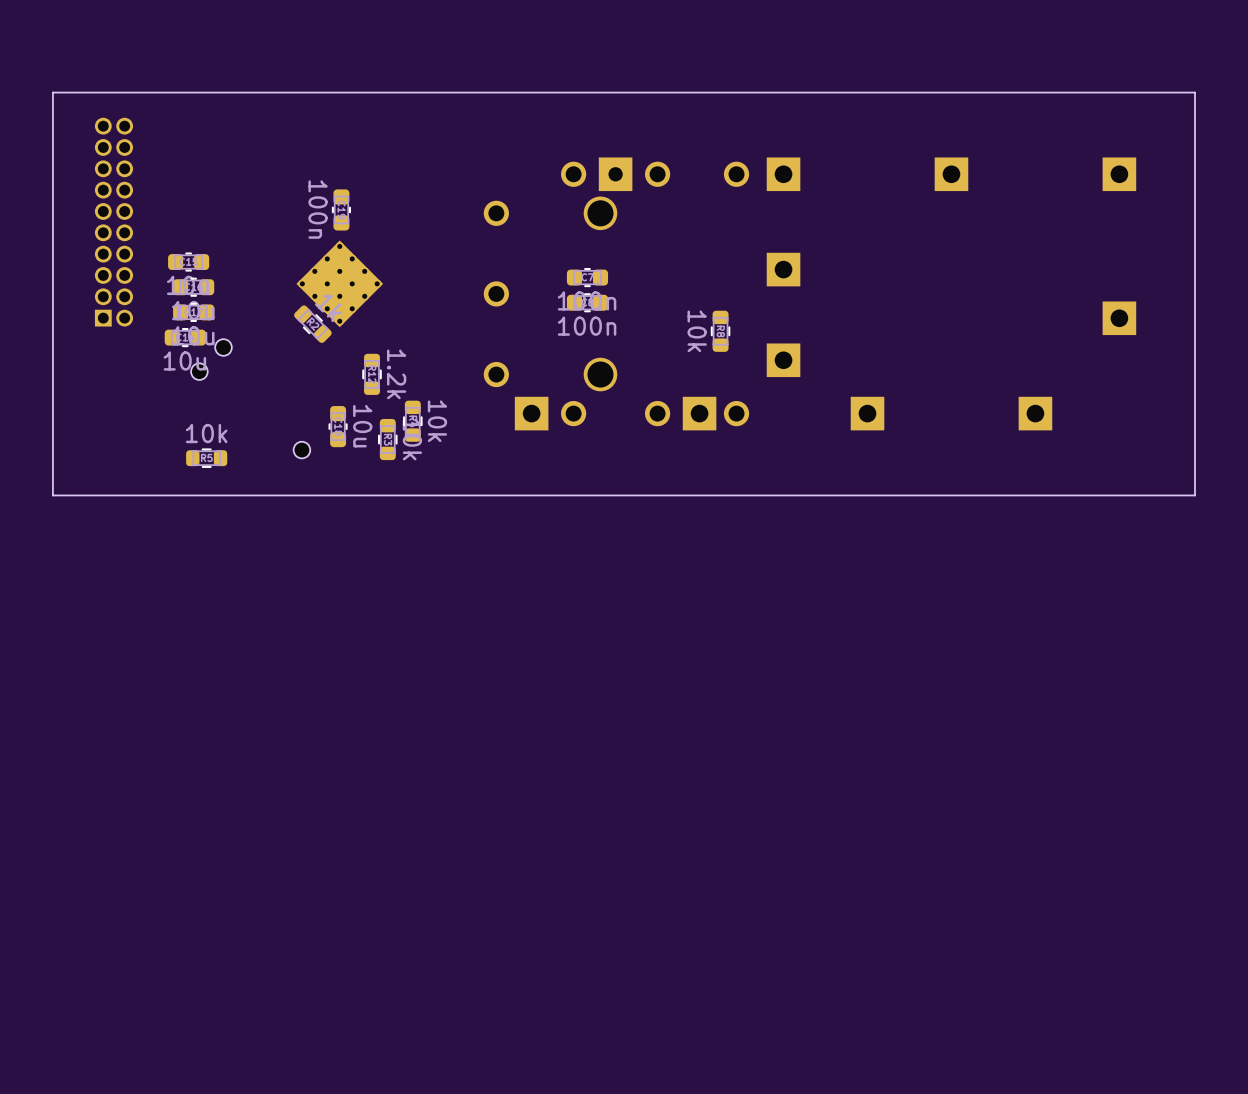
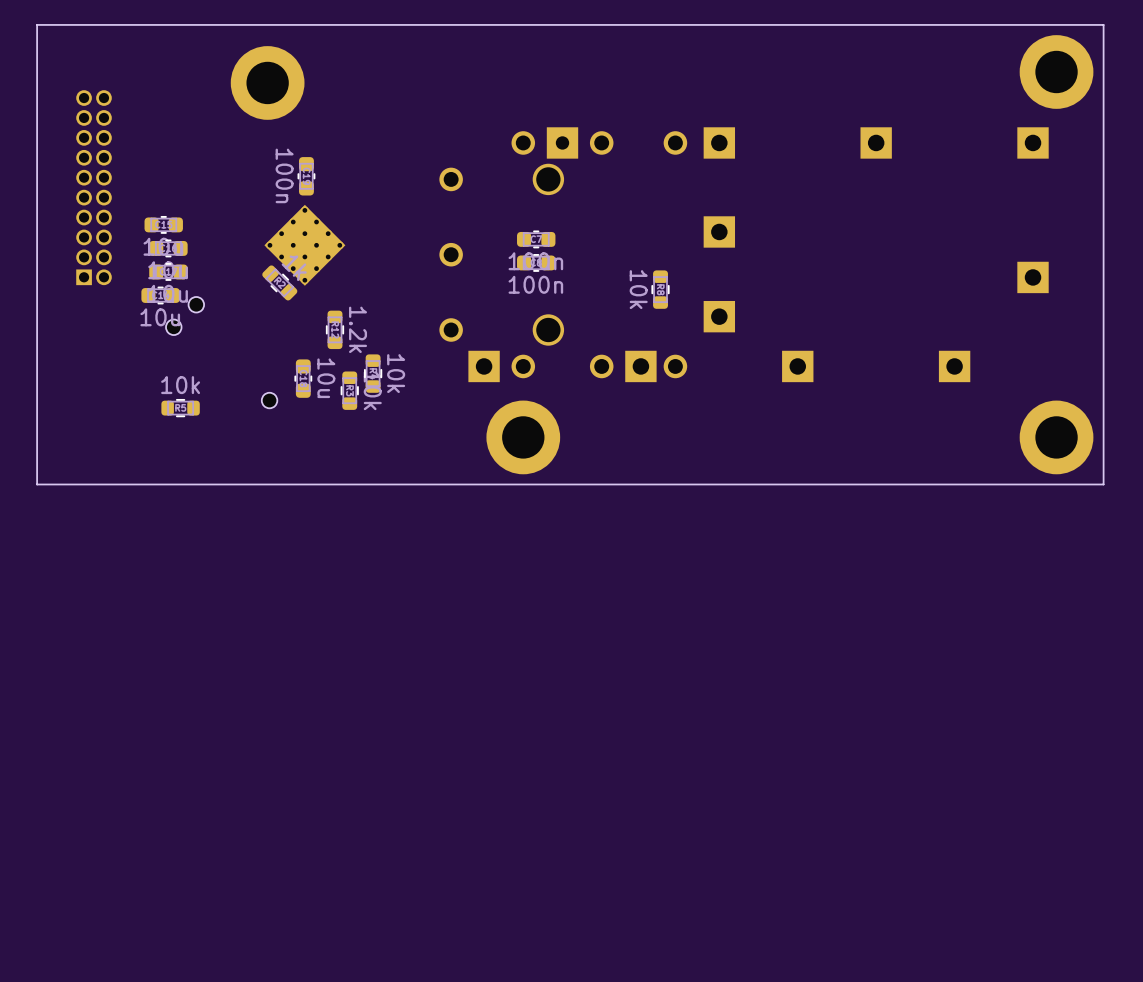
board edge: (1194, 92) (52, 92) (52, 495) (1194, 495) -> (1103, 66) (1103, 24) (37, 24) (37, 484) (1103, 484) (1103, 442)
part: none -> (1056, 71)
part: none -> (267, 82)
part: none -> (523, 437)
part: none -> (1056, 437)

